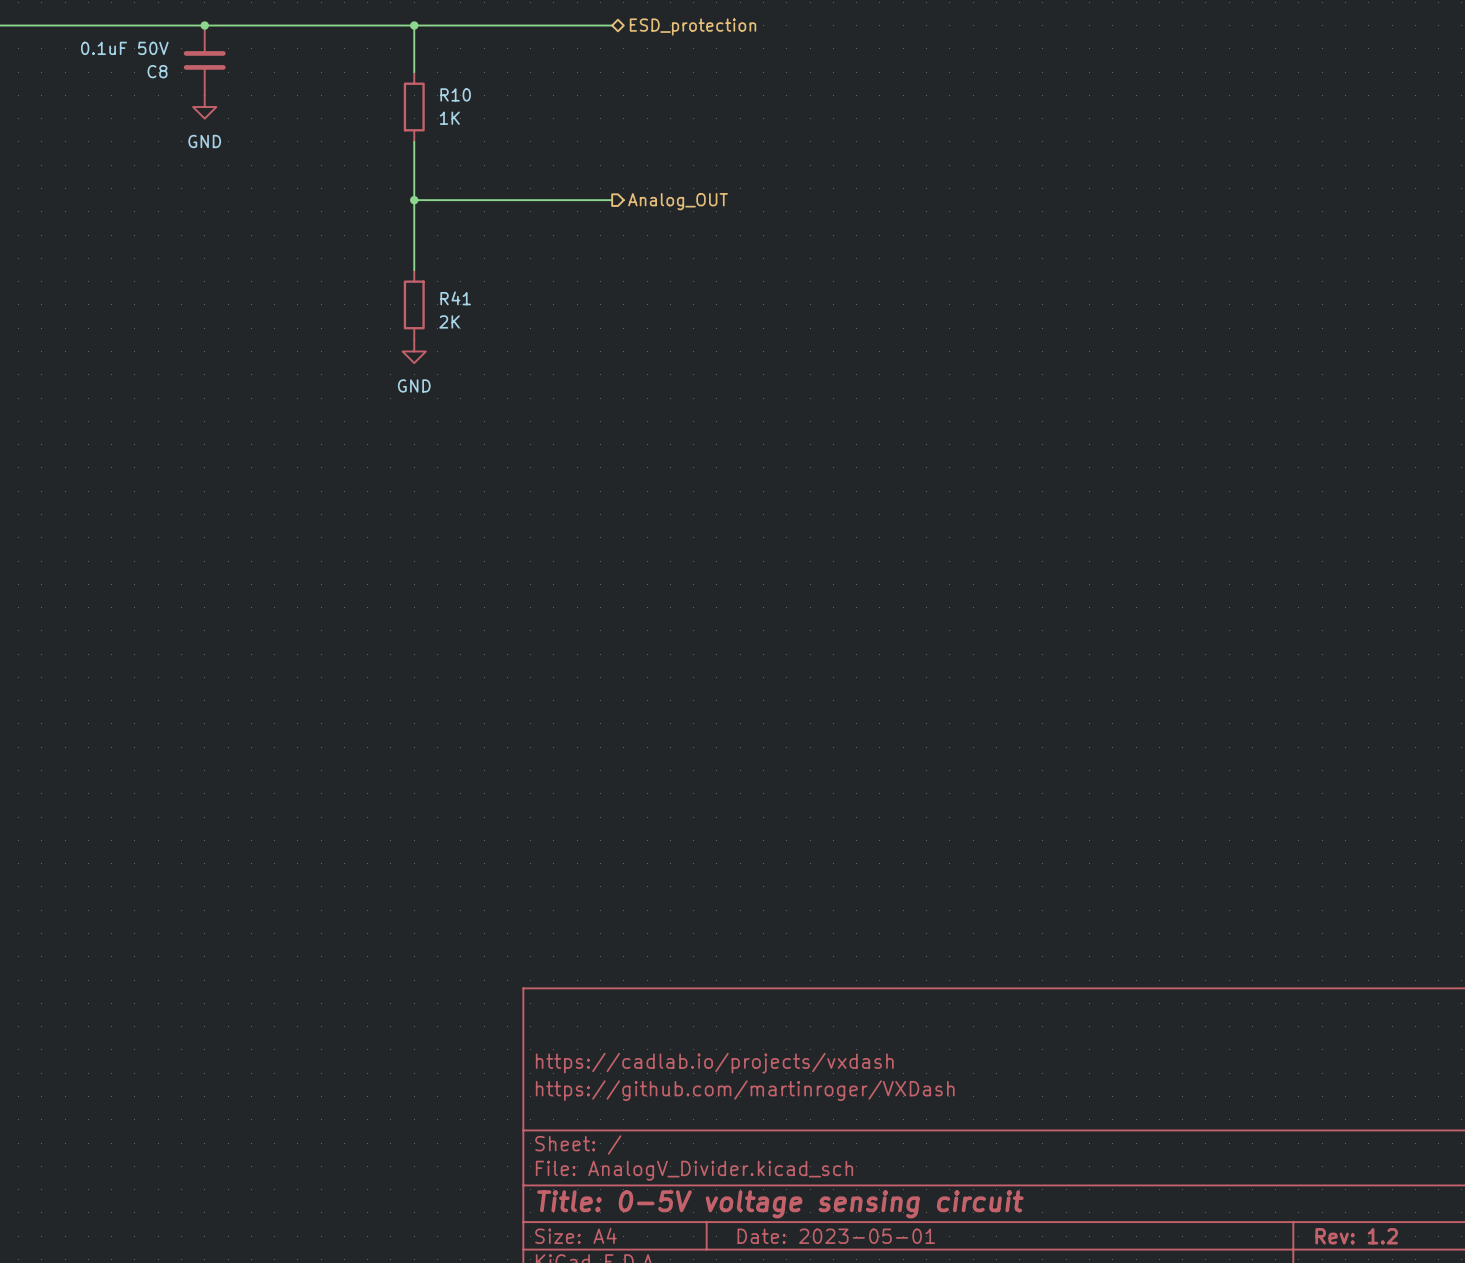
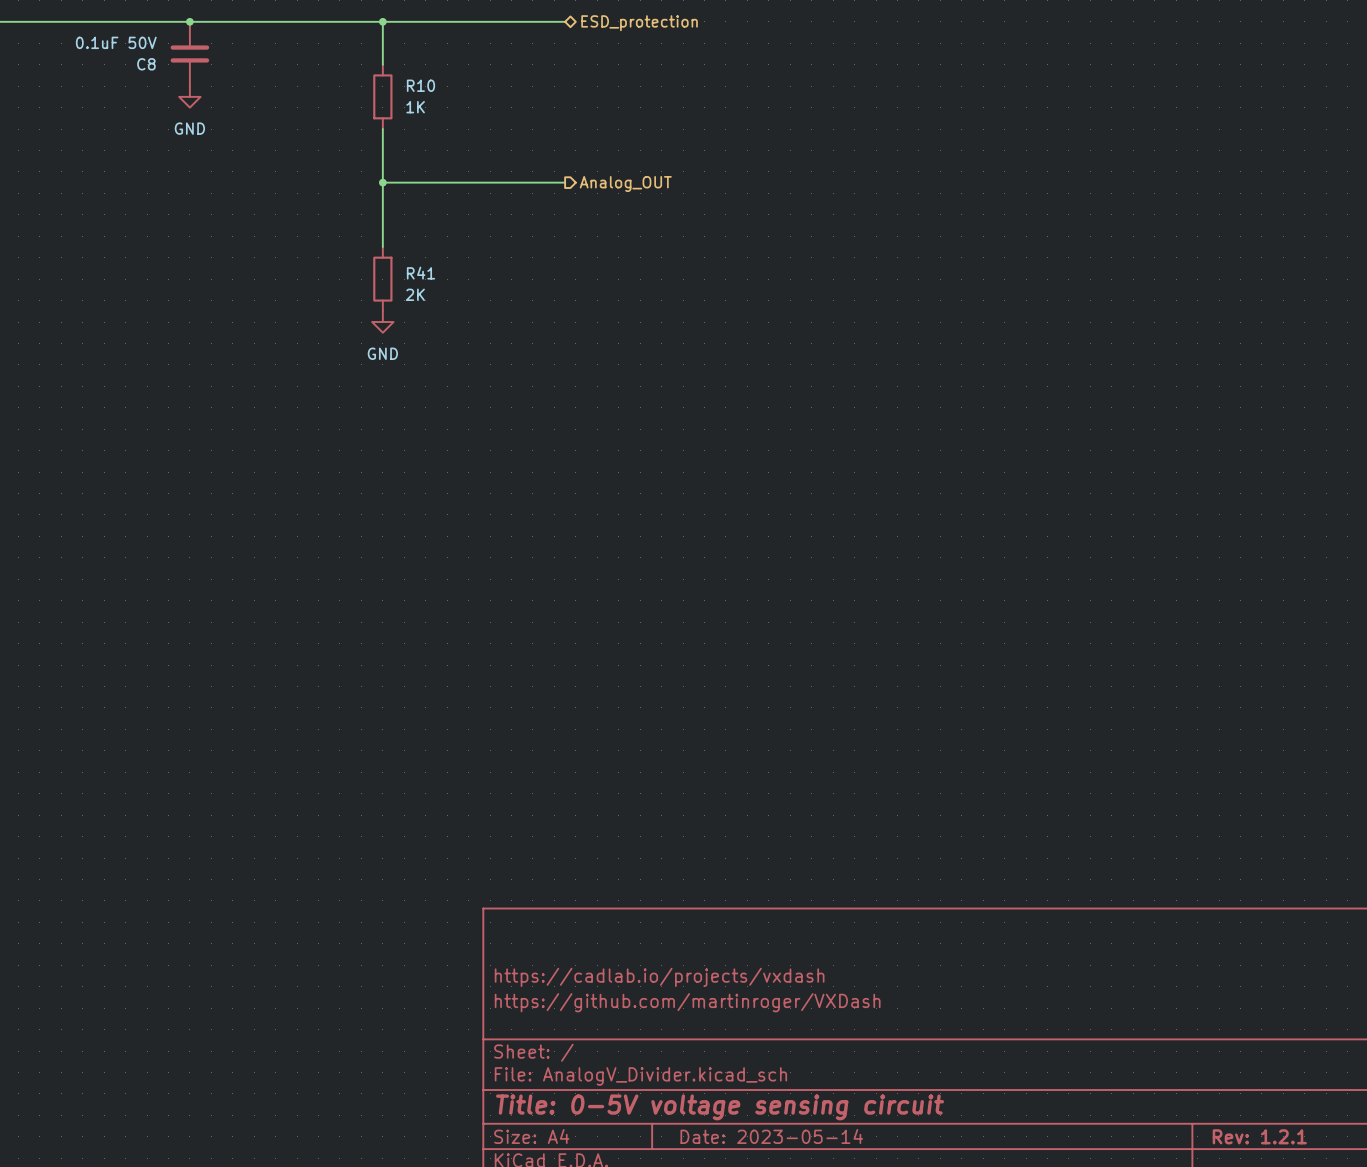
title block: Date: 2023-05-01 (836, 1236) -> Date: 2023-05-14 (771, 1136)
title block: Rev: 1.2 (1356, 1236) -> Rev: 1.2.1 (1259, 1136)

